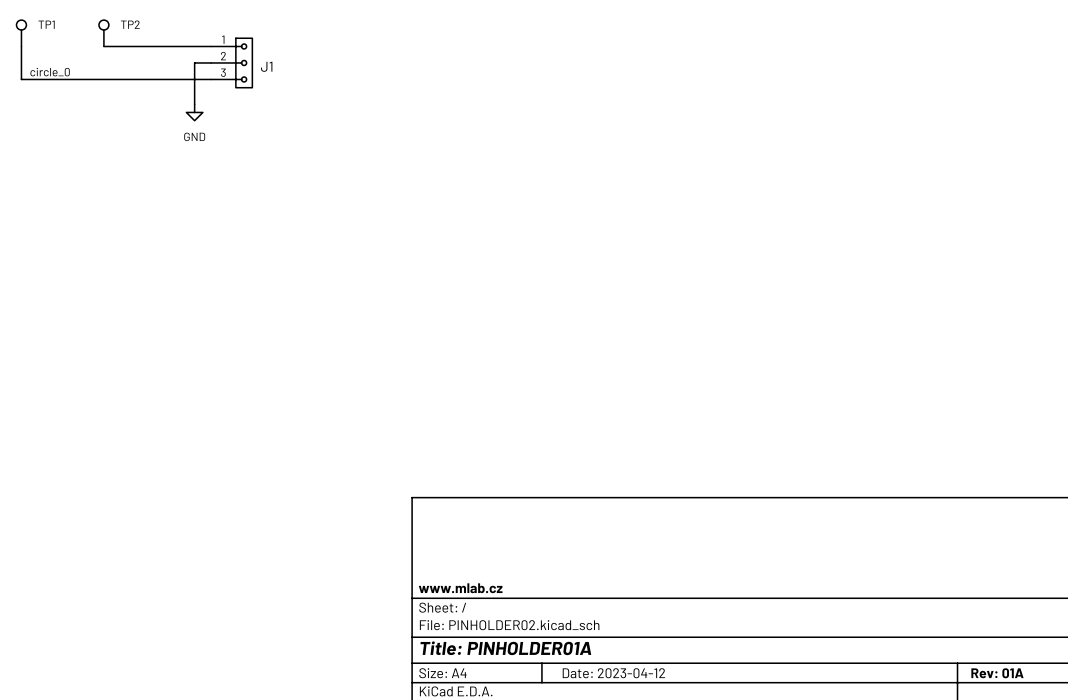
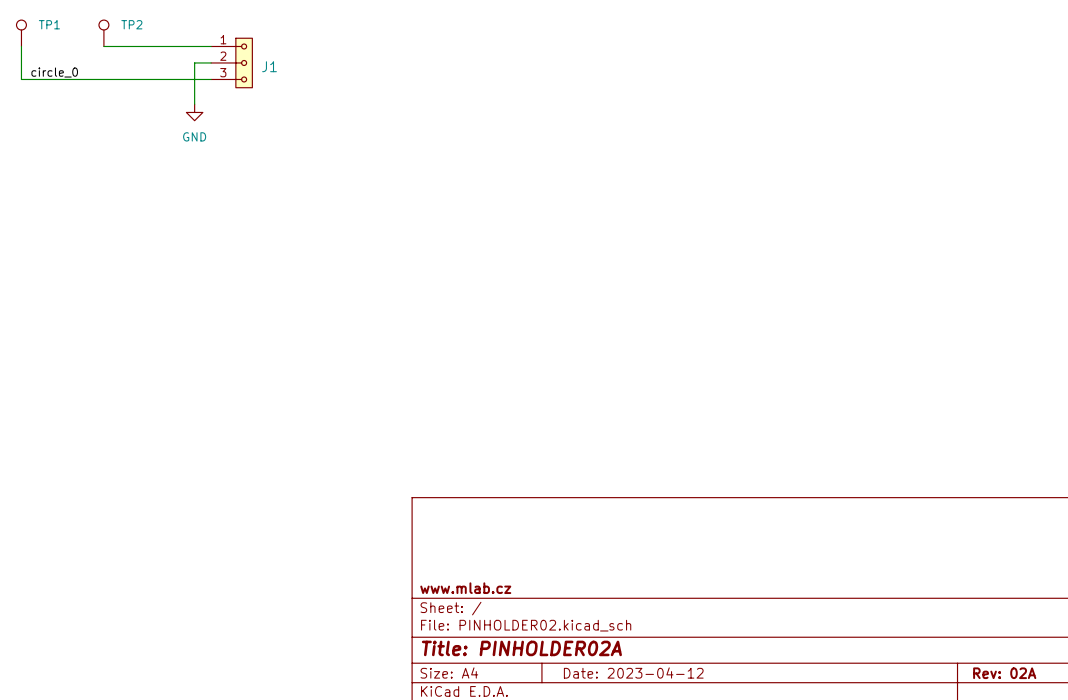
title block: Title: PINHOLDER01A (505, 648) -> Title: PINHOLDER02A (521, 648)
title block: Rev: 01A (997, 673) -> Rev: 02A (1004, 673)

